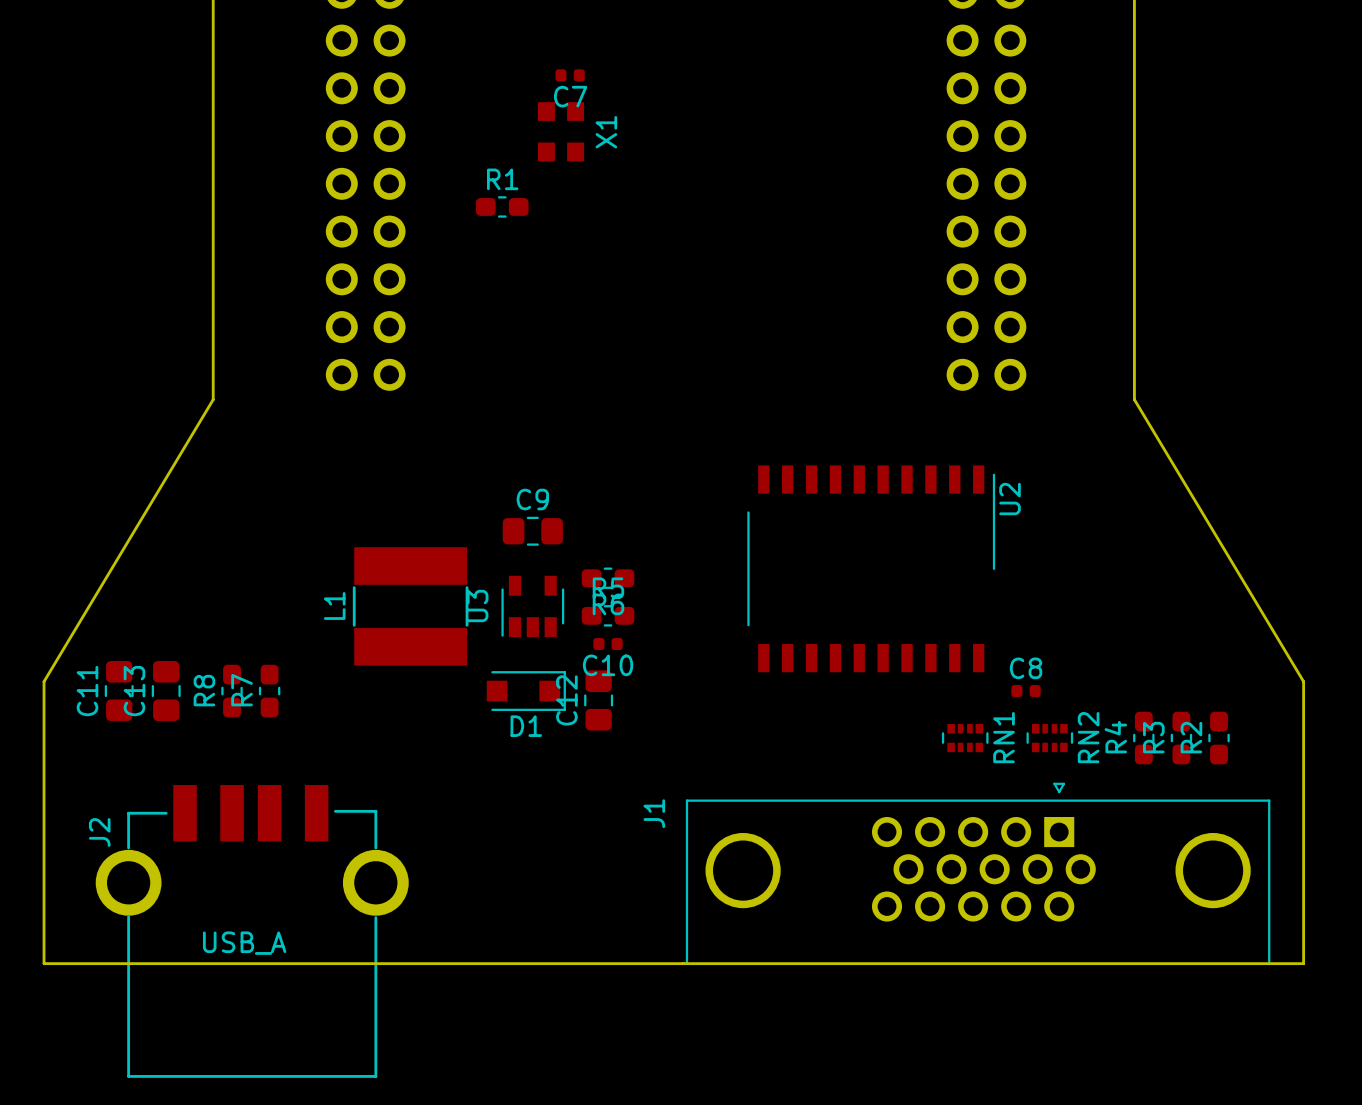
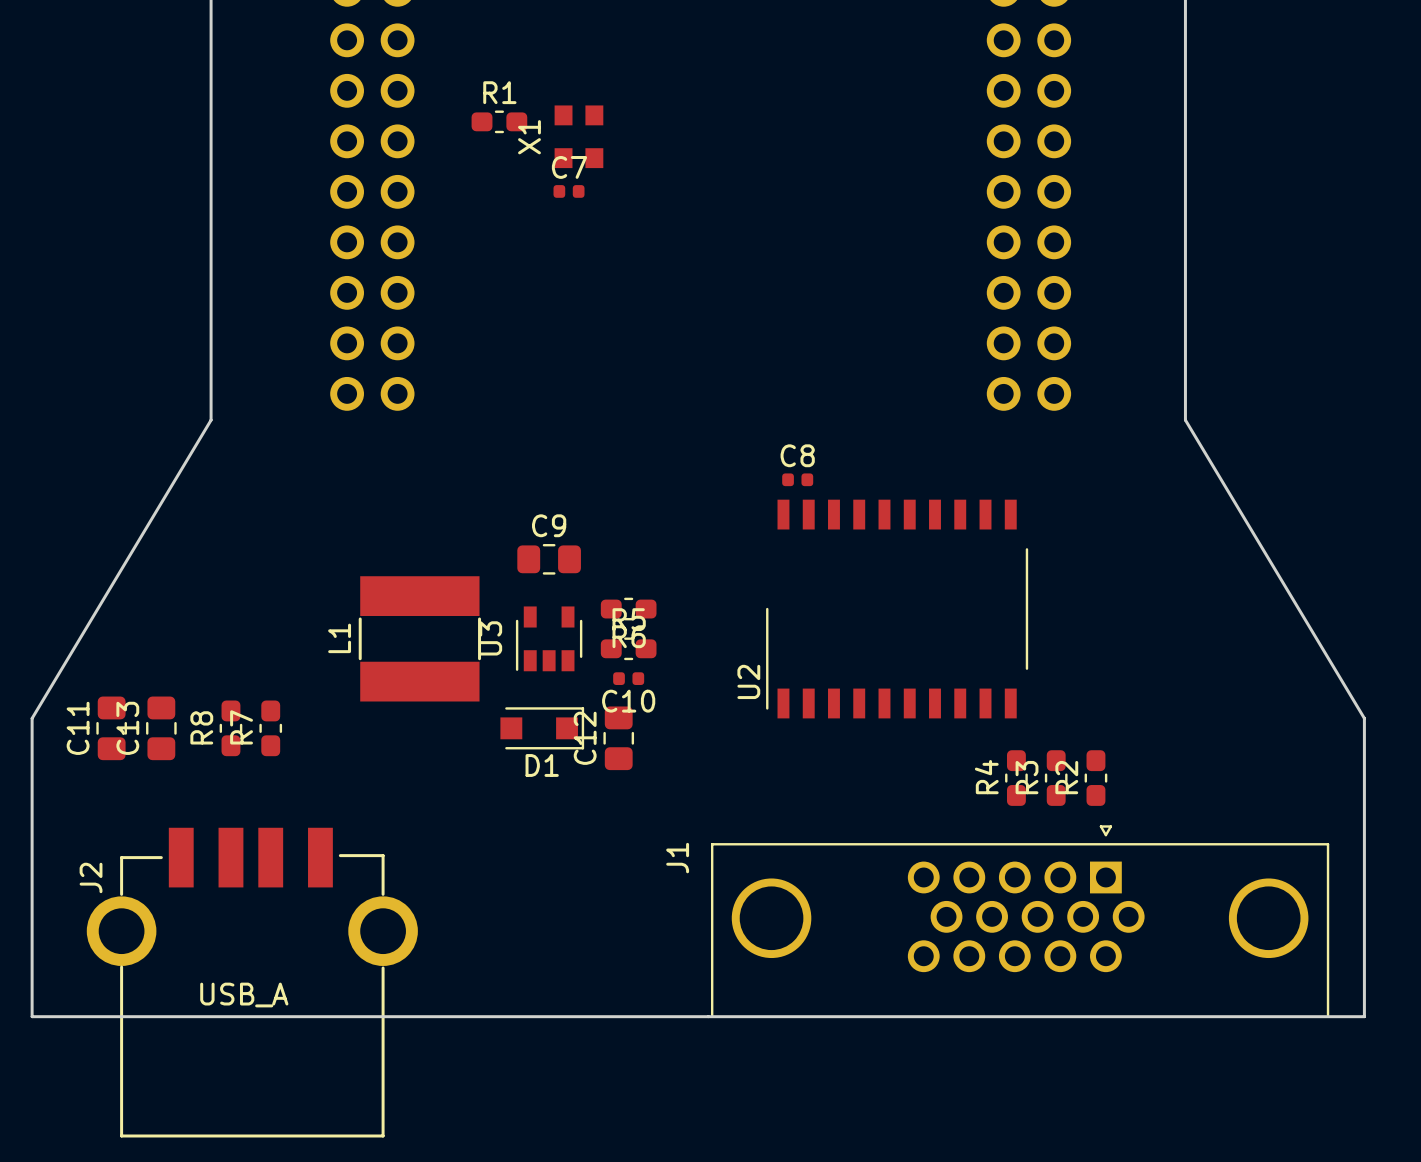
C7 position: (570, 75) -> (569, 191)
C7 name position: C7 (570, 96) -> C7 (569, 167)
X1 name position: X1 (606, 132) -> X1 (529, 137)
R1 position: (502, 206) -> (499, 121)
U2 rotation: 0° (871, 568) -> 180° (897, 609)
C8 position: (1026, 691) -> (797, 479)
RN1: (965, 738) -> none
RN2: (1049, 738) -> none
R4 position: (1143, 738) -> (1016, 778)
R3 position: (1181, 738) -> (1056, 778)
R2 position: (1219, 738) -> (1095, 778)

